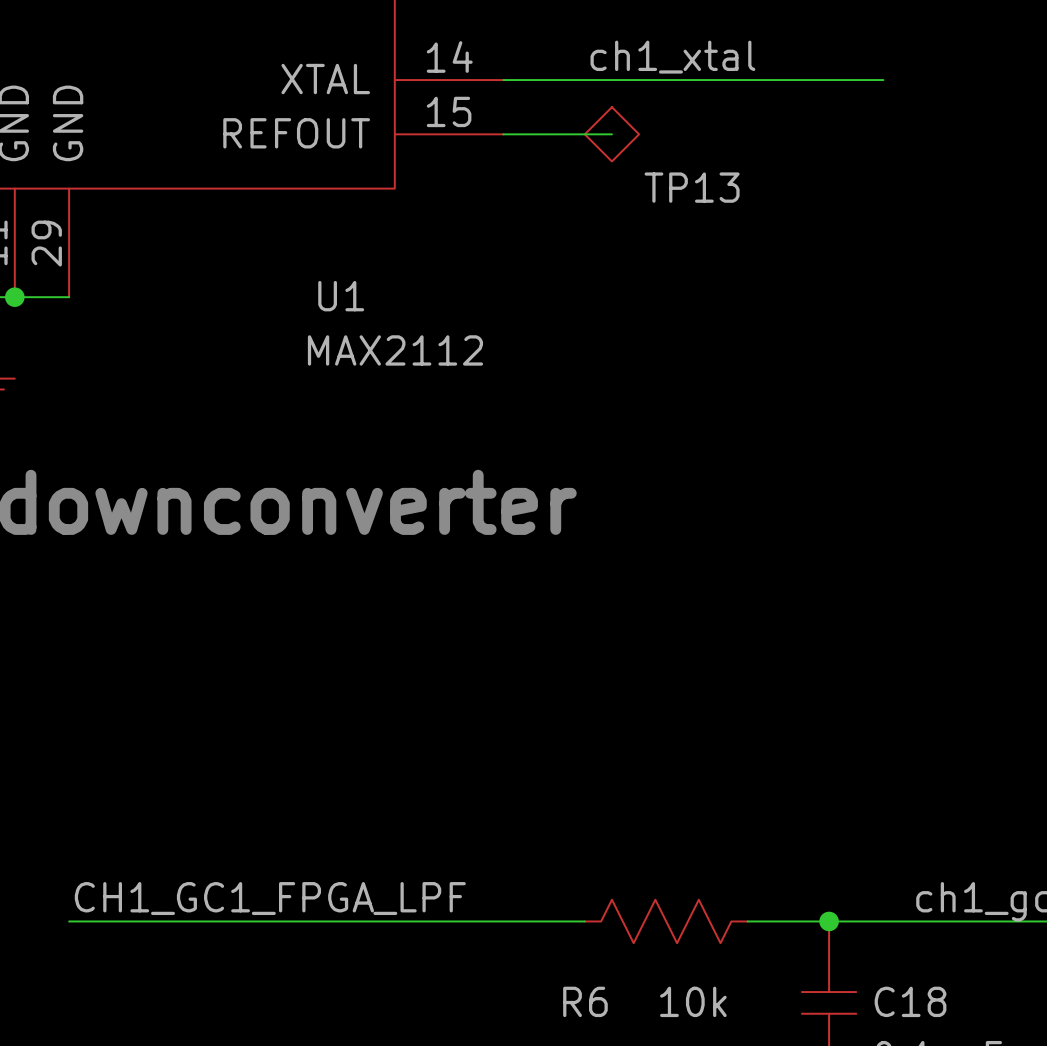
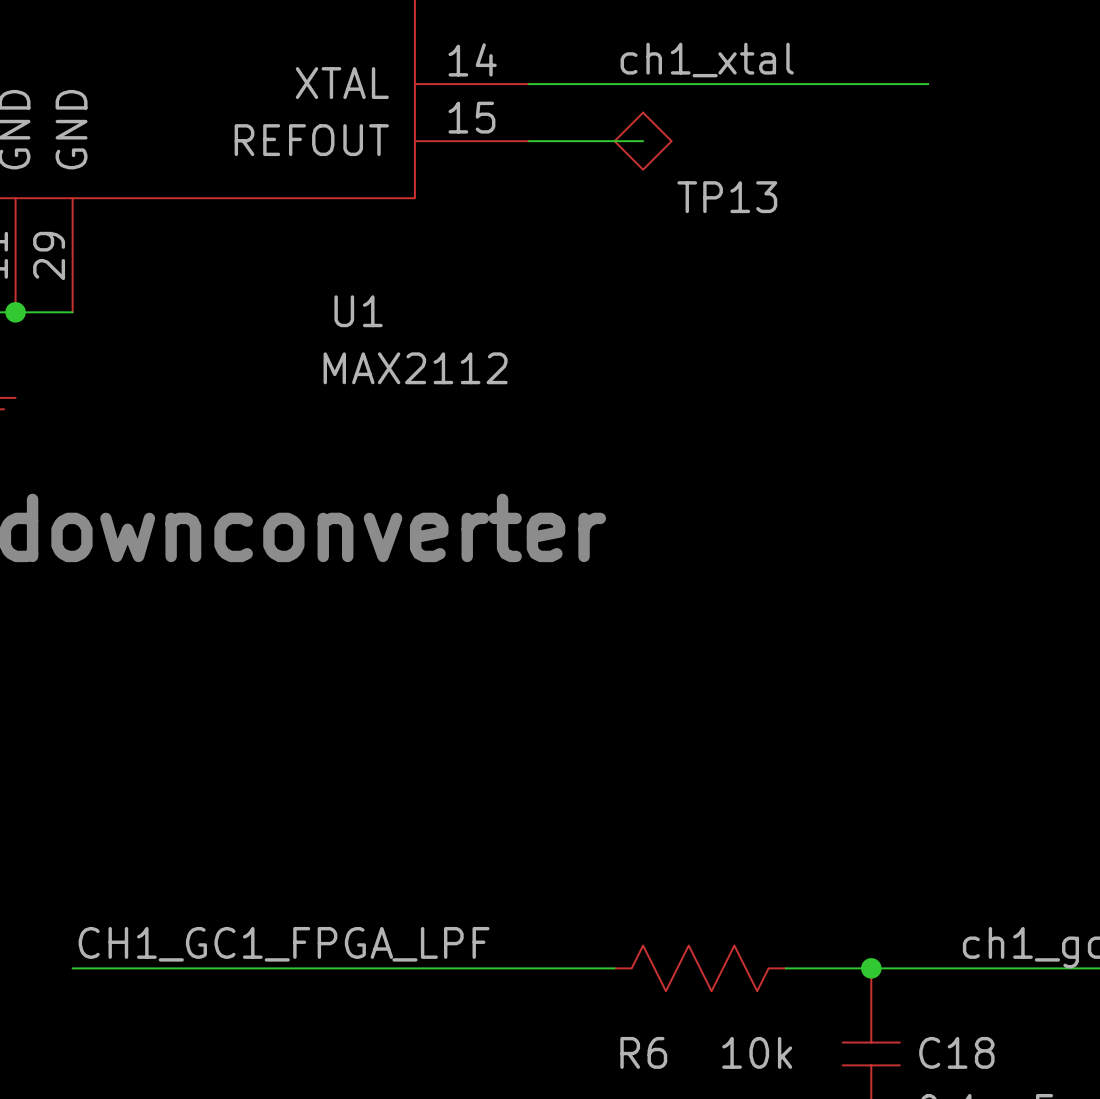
R6 name position: R6 (585, 1001) -> R6 (643, 1052)
R6 value position: 10k (693, 1001) -> 10k (757, 1052)

